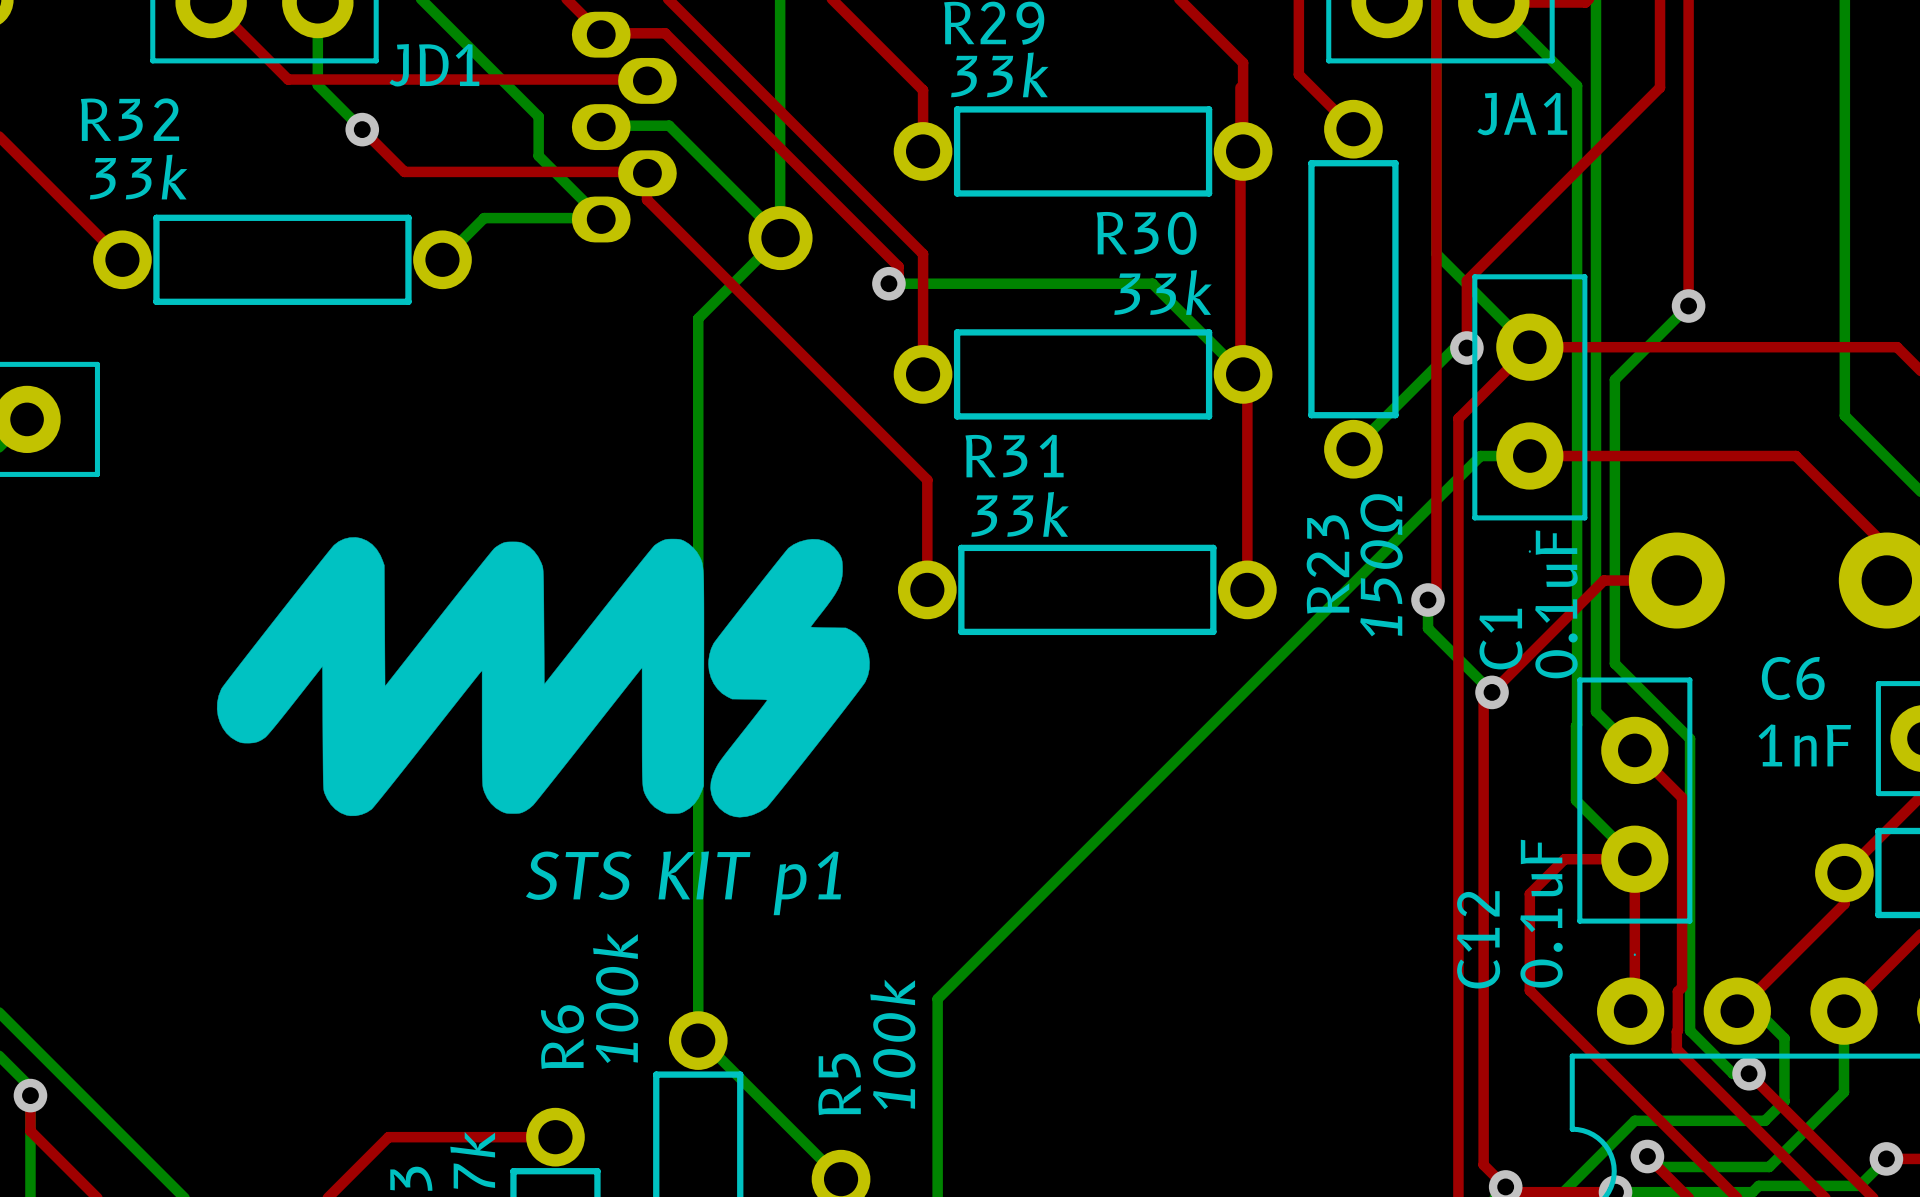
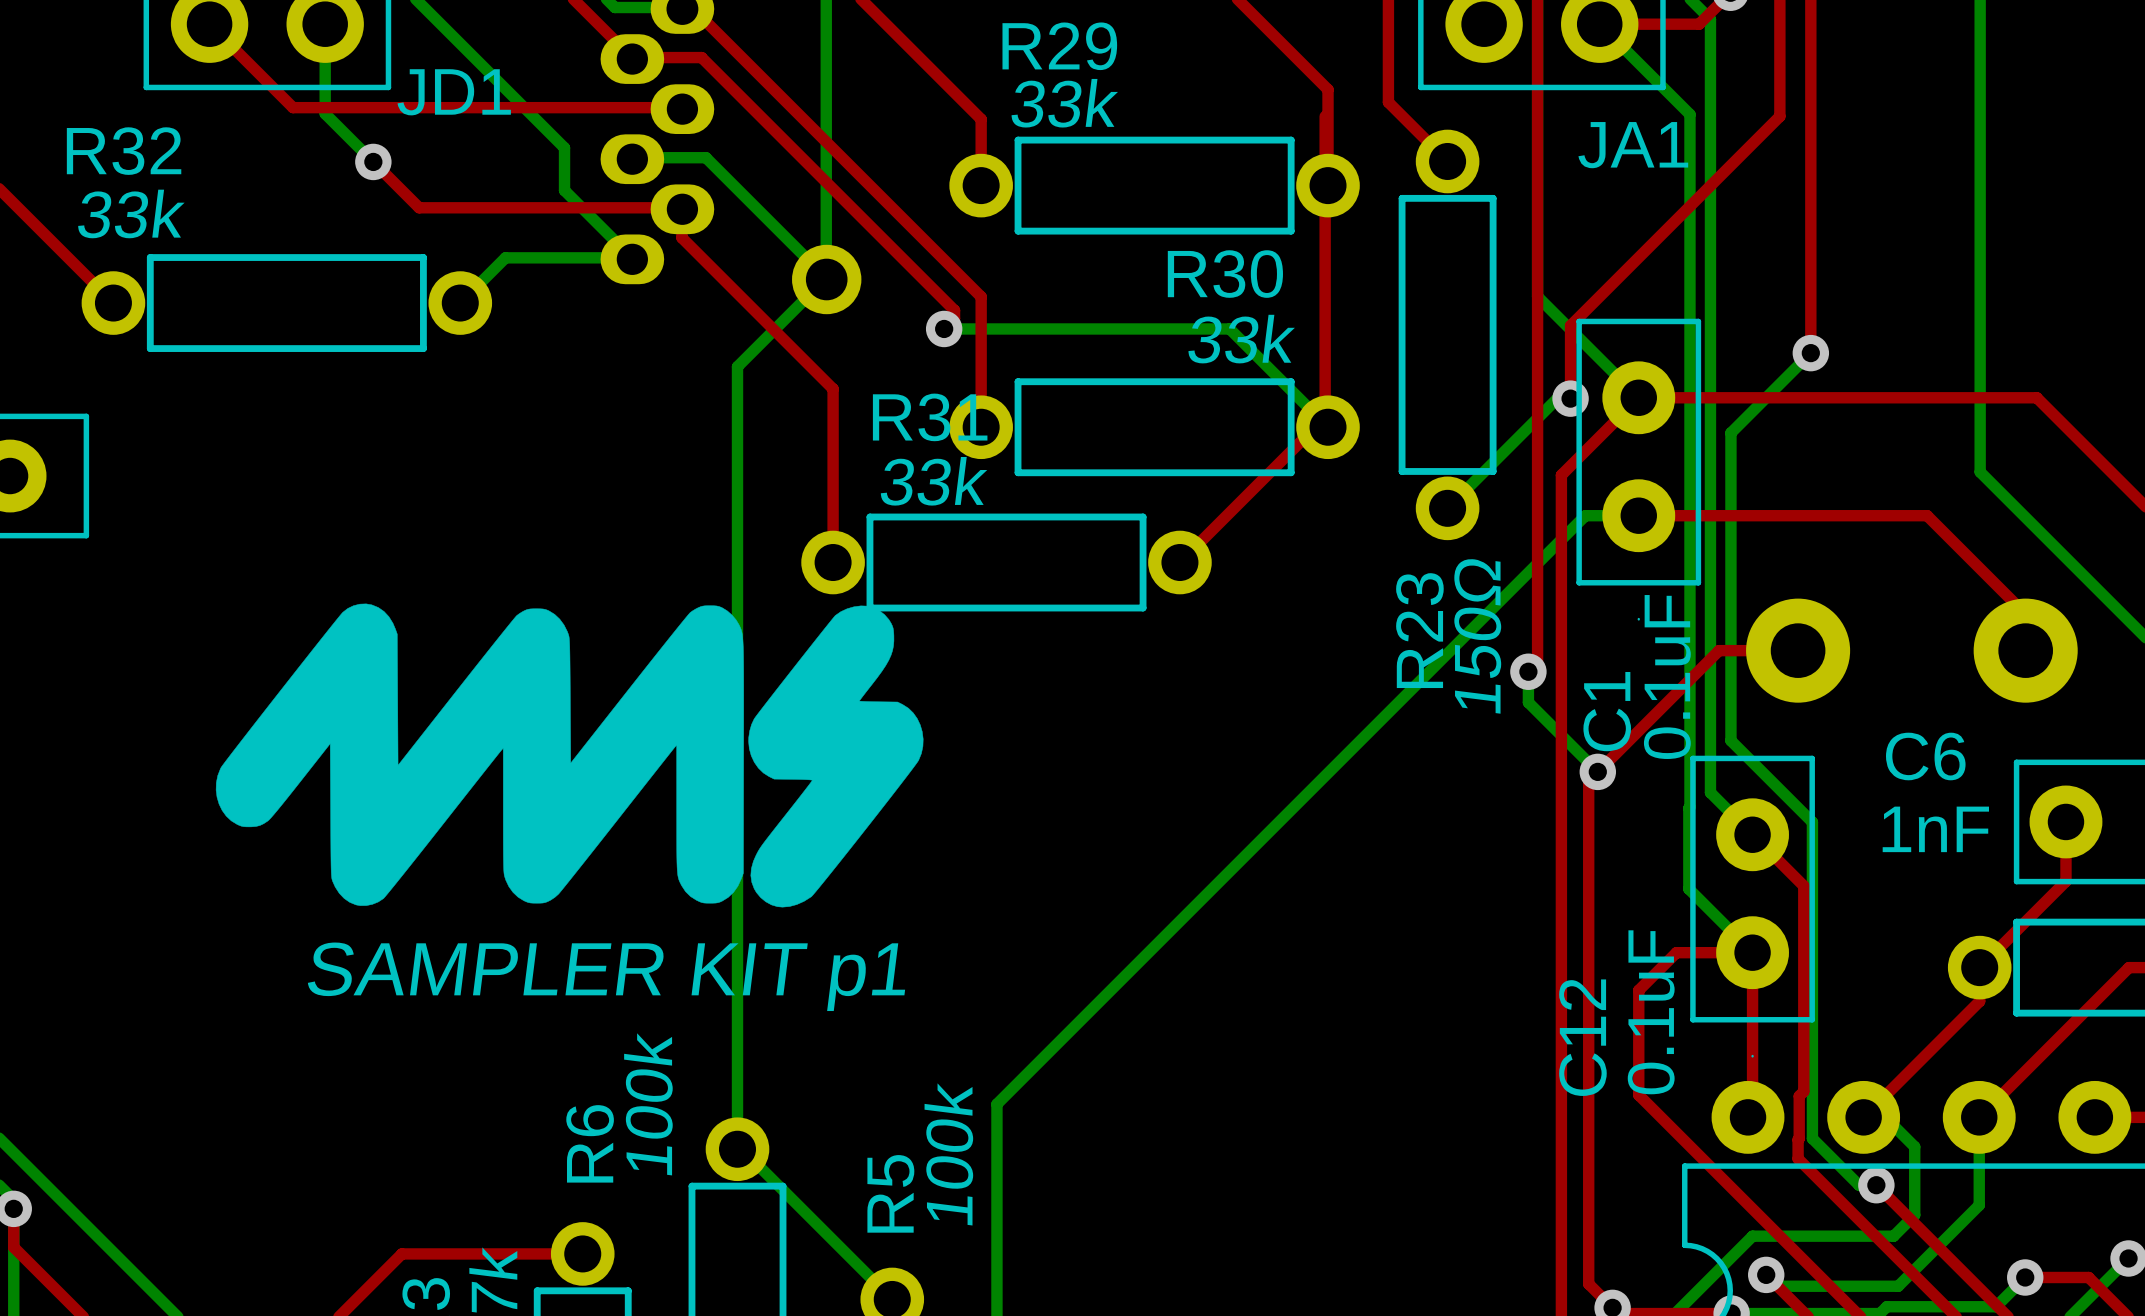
top track: (786, 339) (927, 480) (927, 589) -> (833, 389) (833, 562)
top track: (1247, 378) (1247, 589) -> (1332, 431) (1310, 431) (1179, 562)
R31 position: (1087, 589) -> (1006, 562)
text: STS KIT p1 (683, 883) -> SAMPLER KIT p1 (606, 976)

